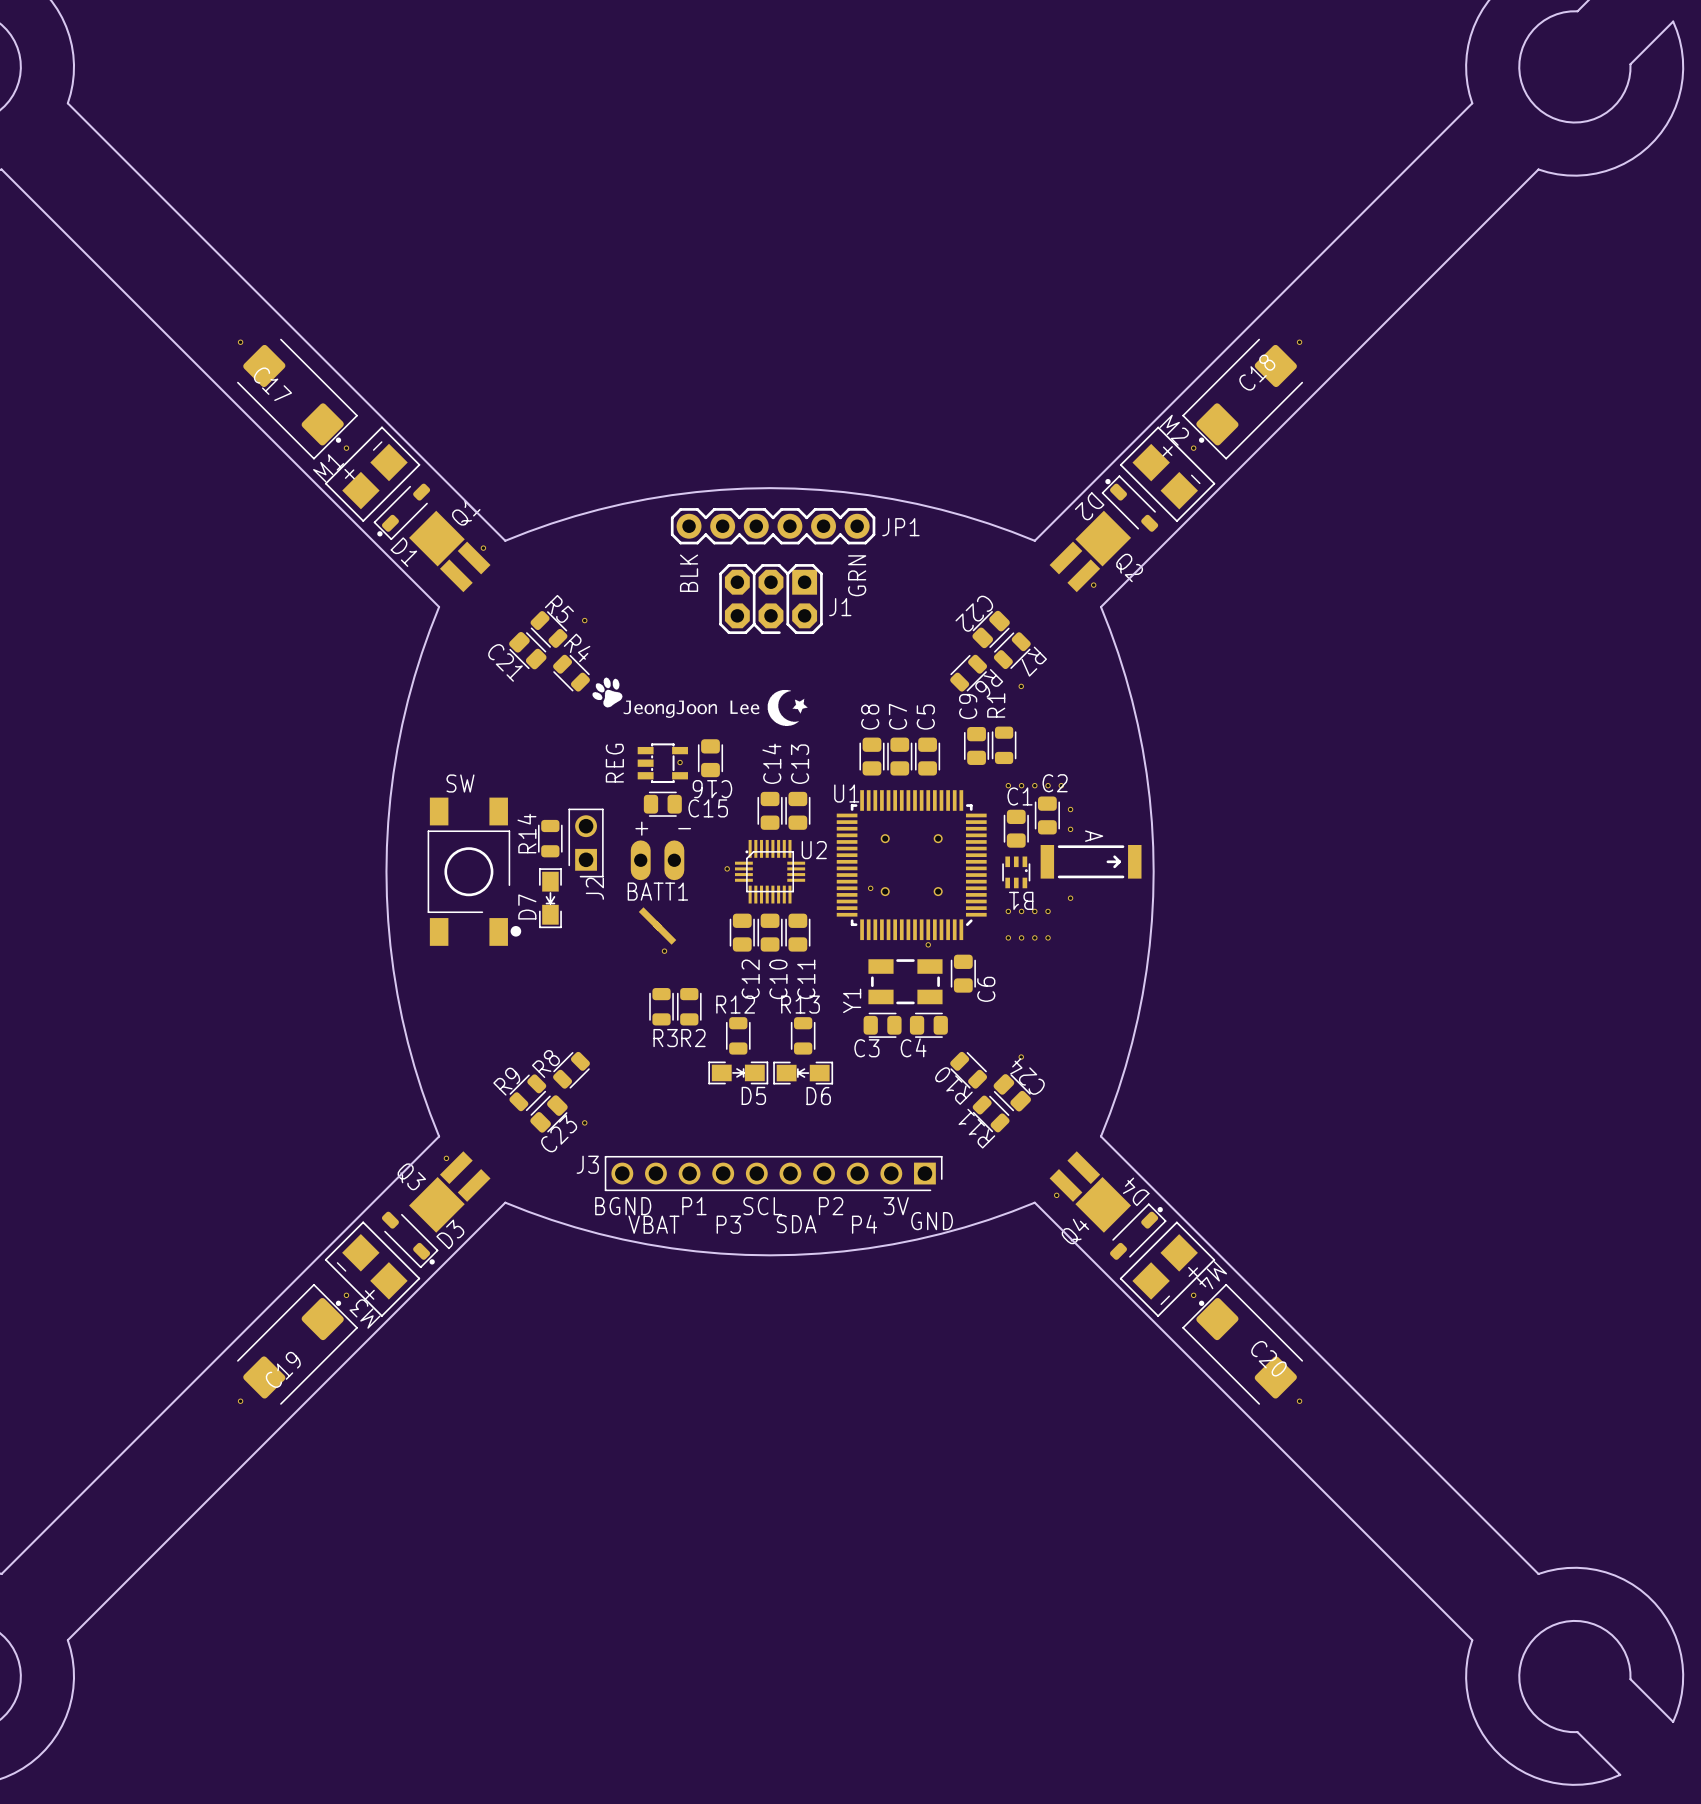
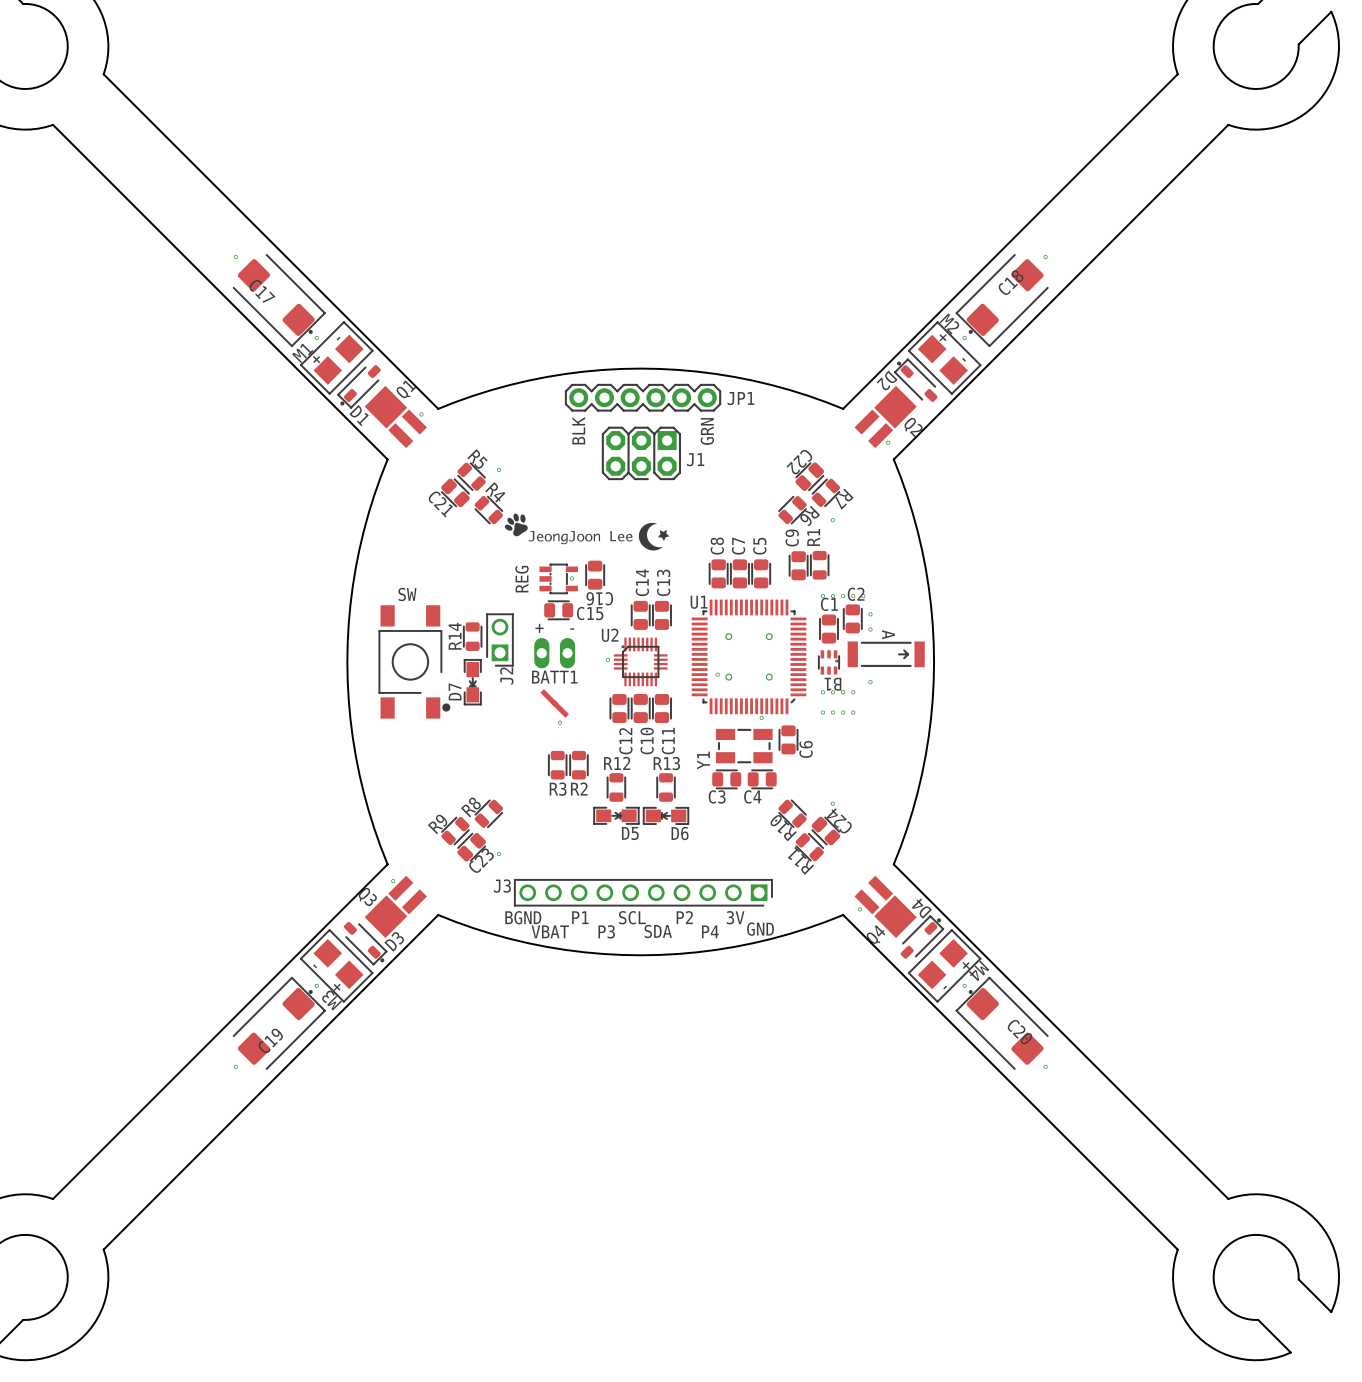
U2 name position: U2 (814, 850) -> U2 (610, 635)

